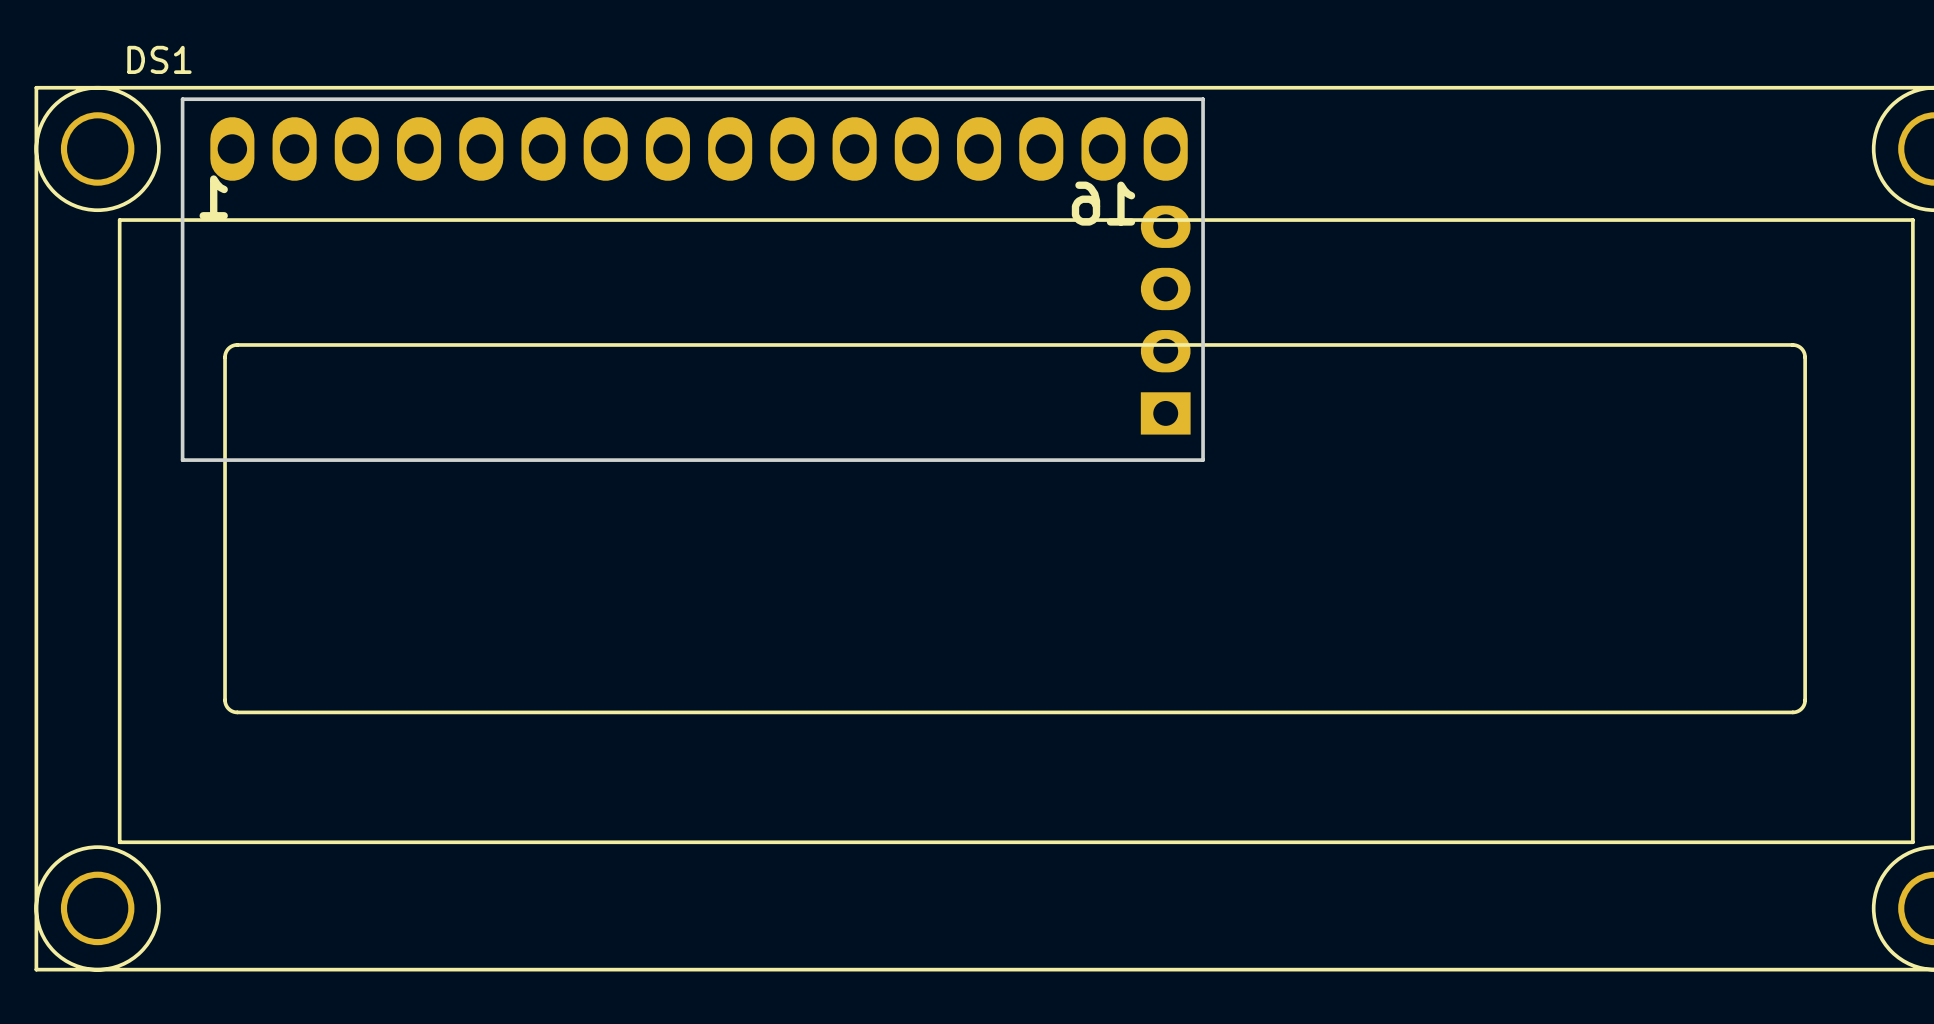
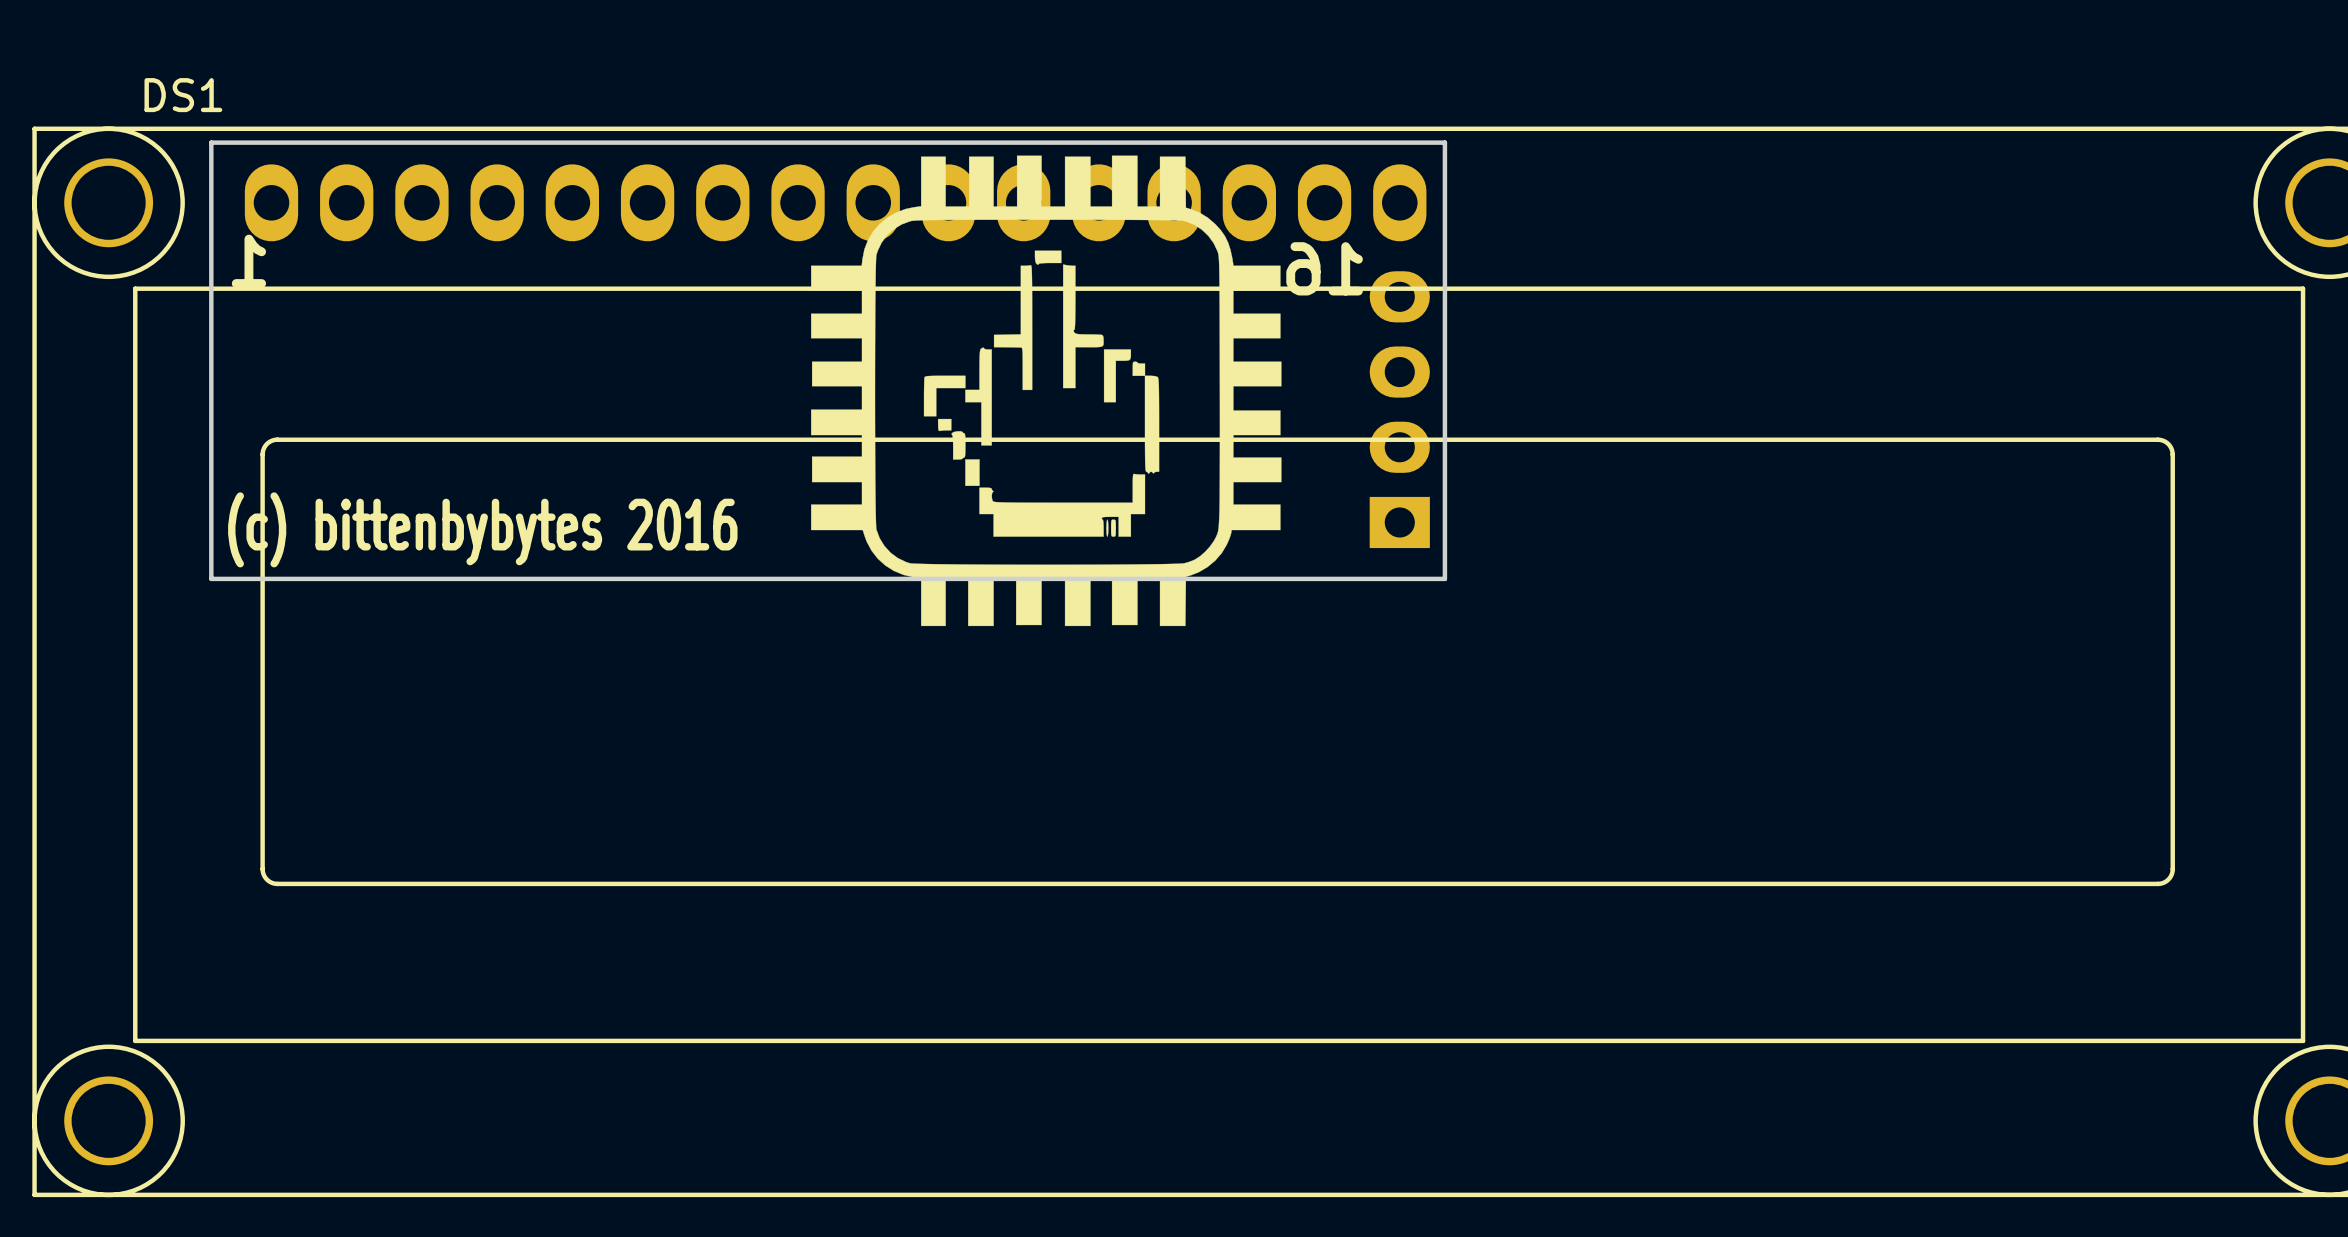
drawing: none -> [811, 155, 1282, 627]
text: none -> (c) bittenbybytes 2016 (482, 529)

